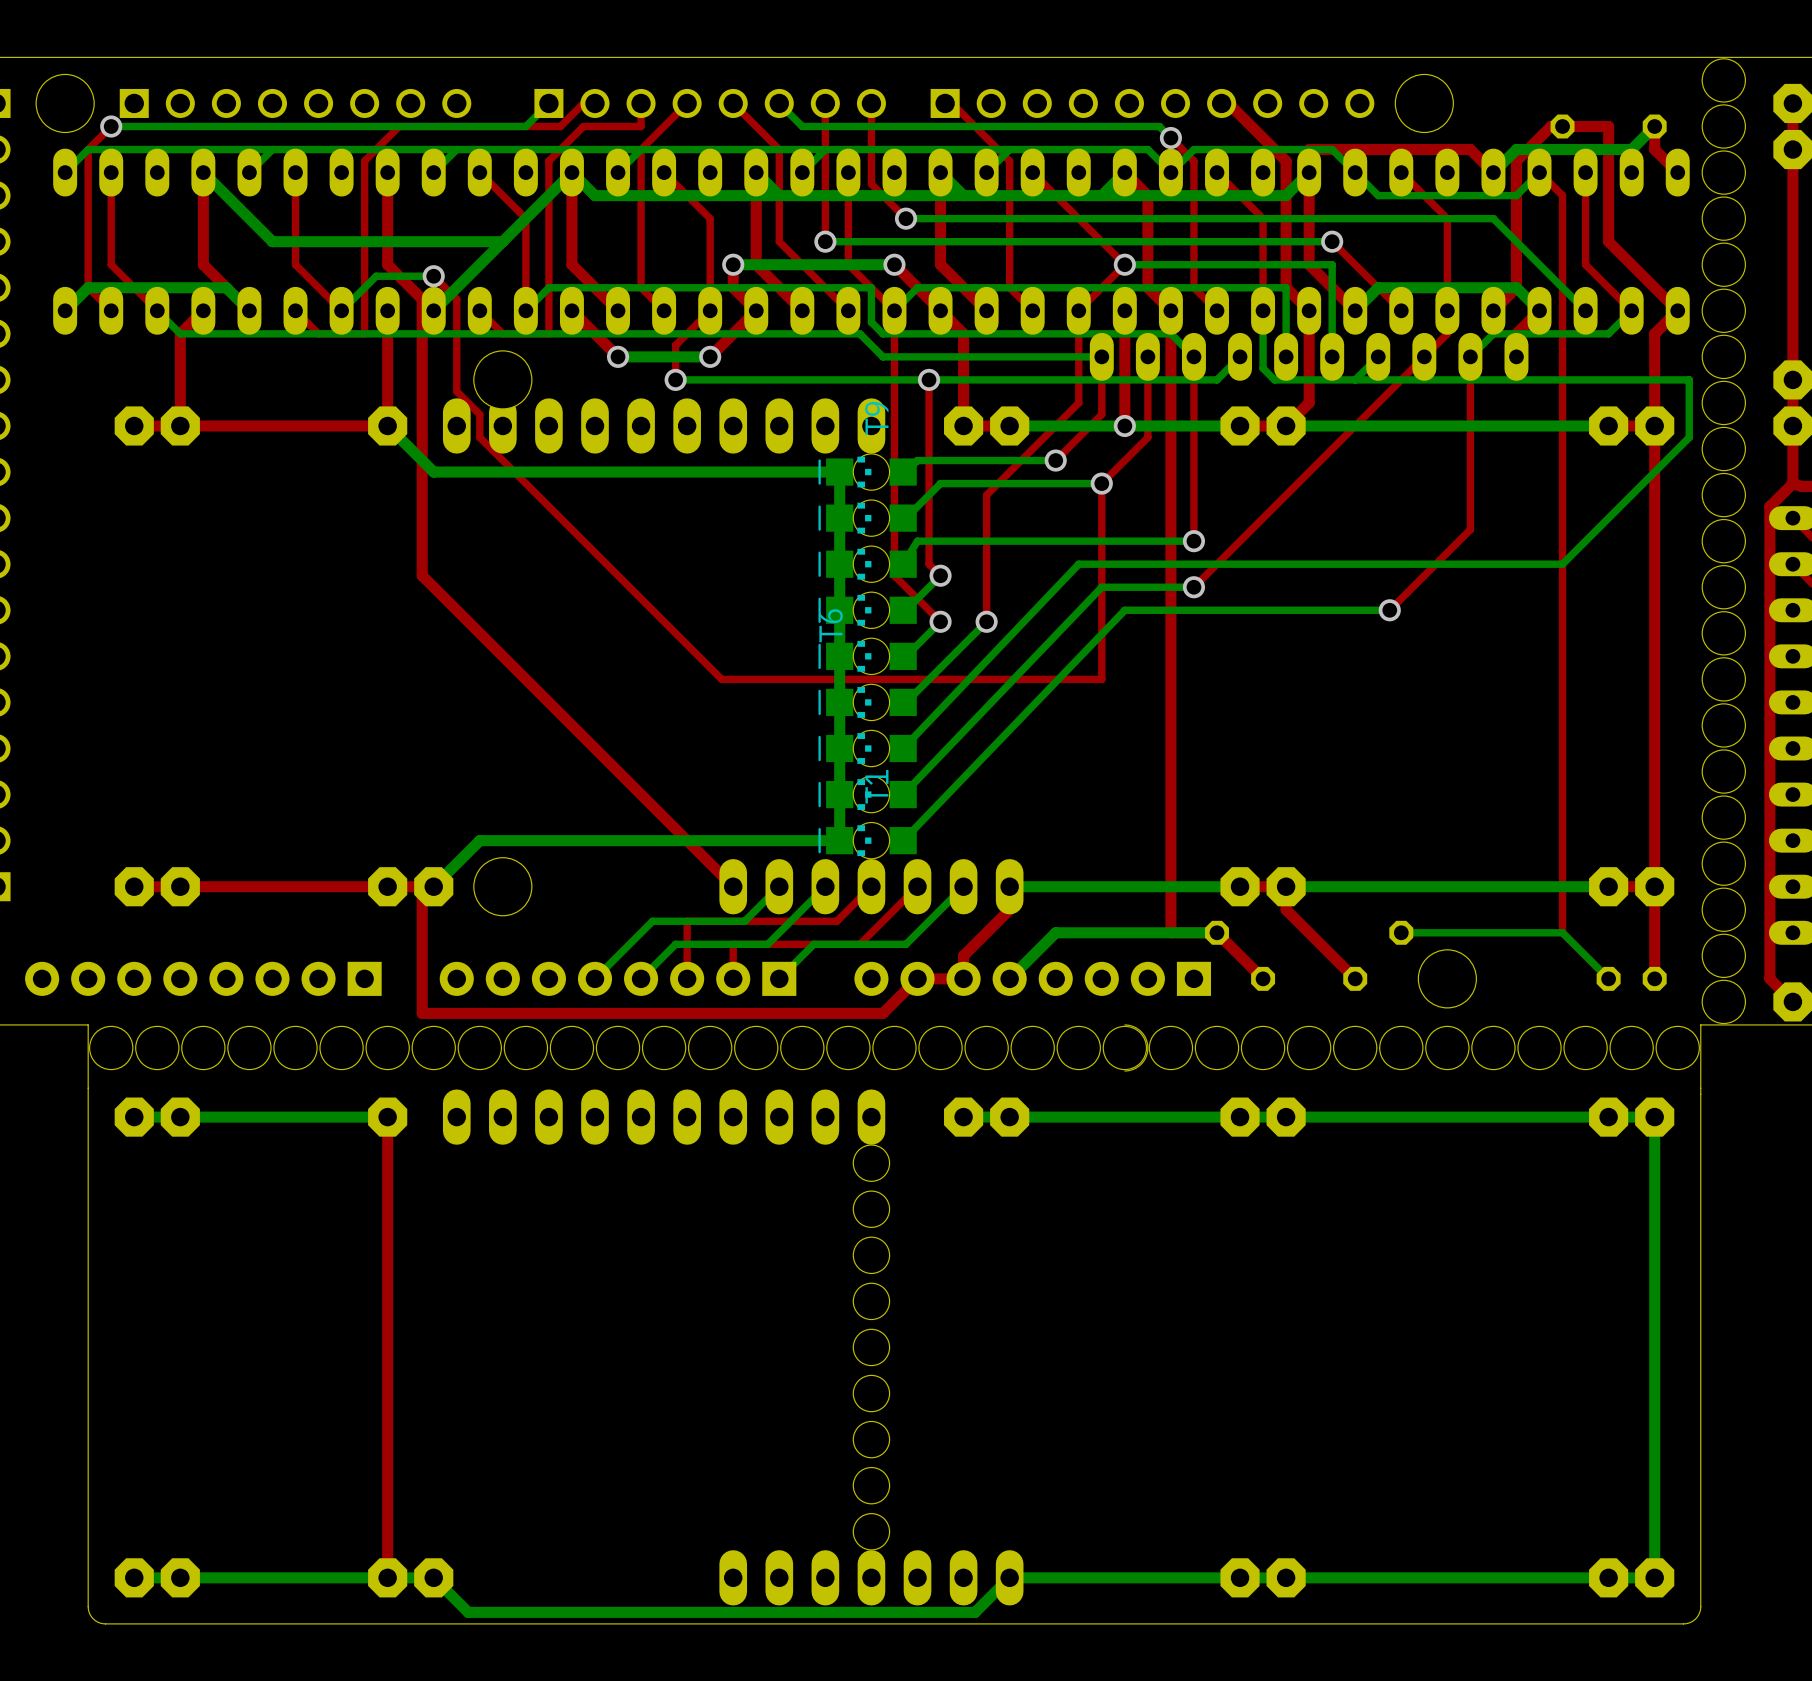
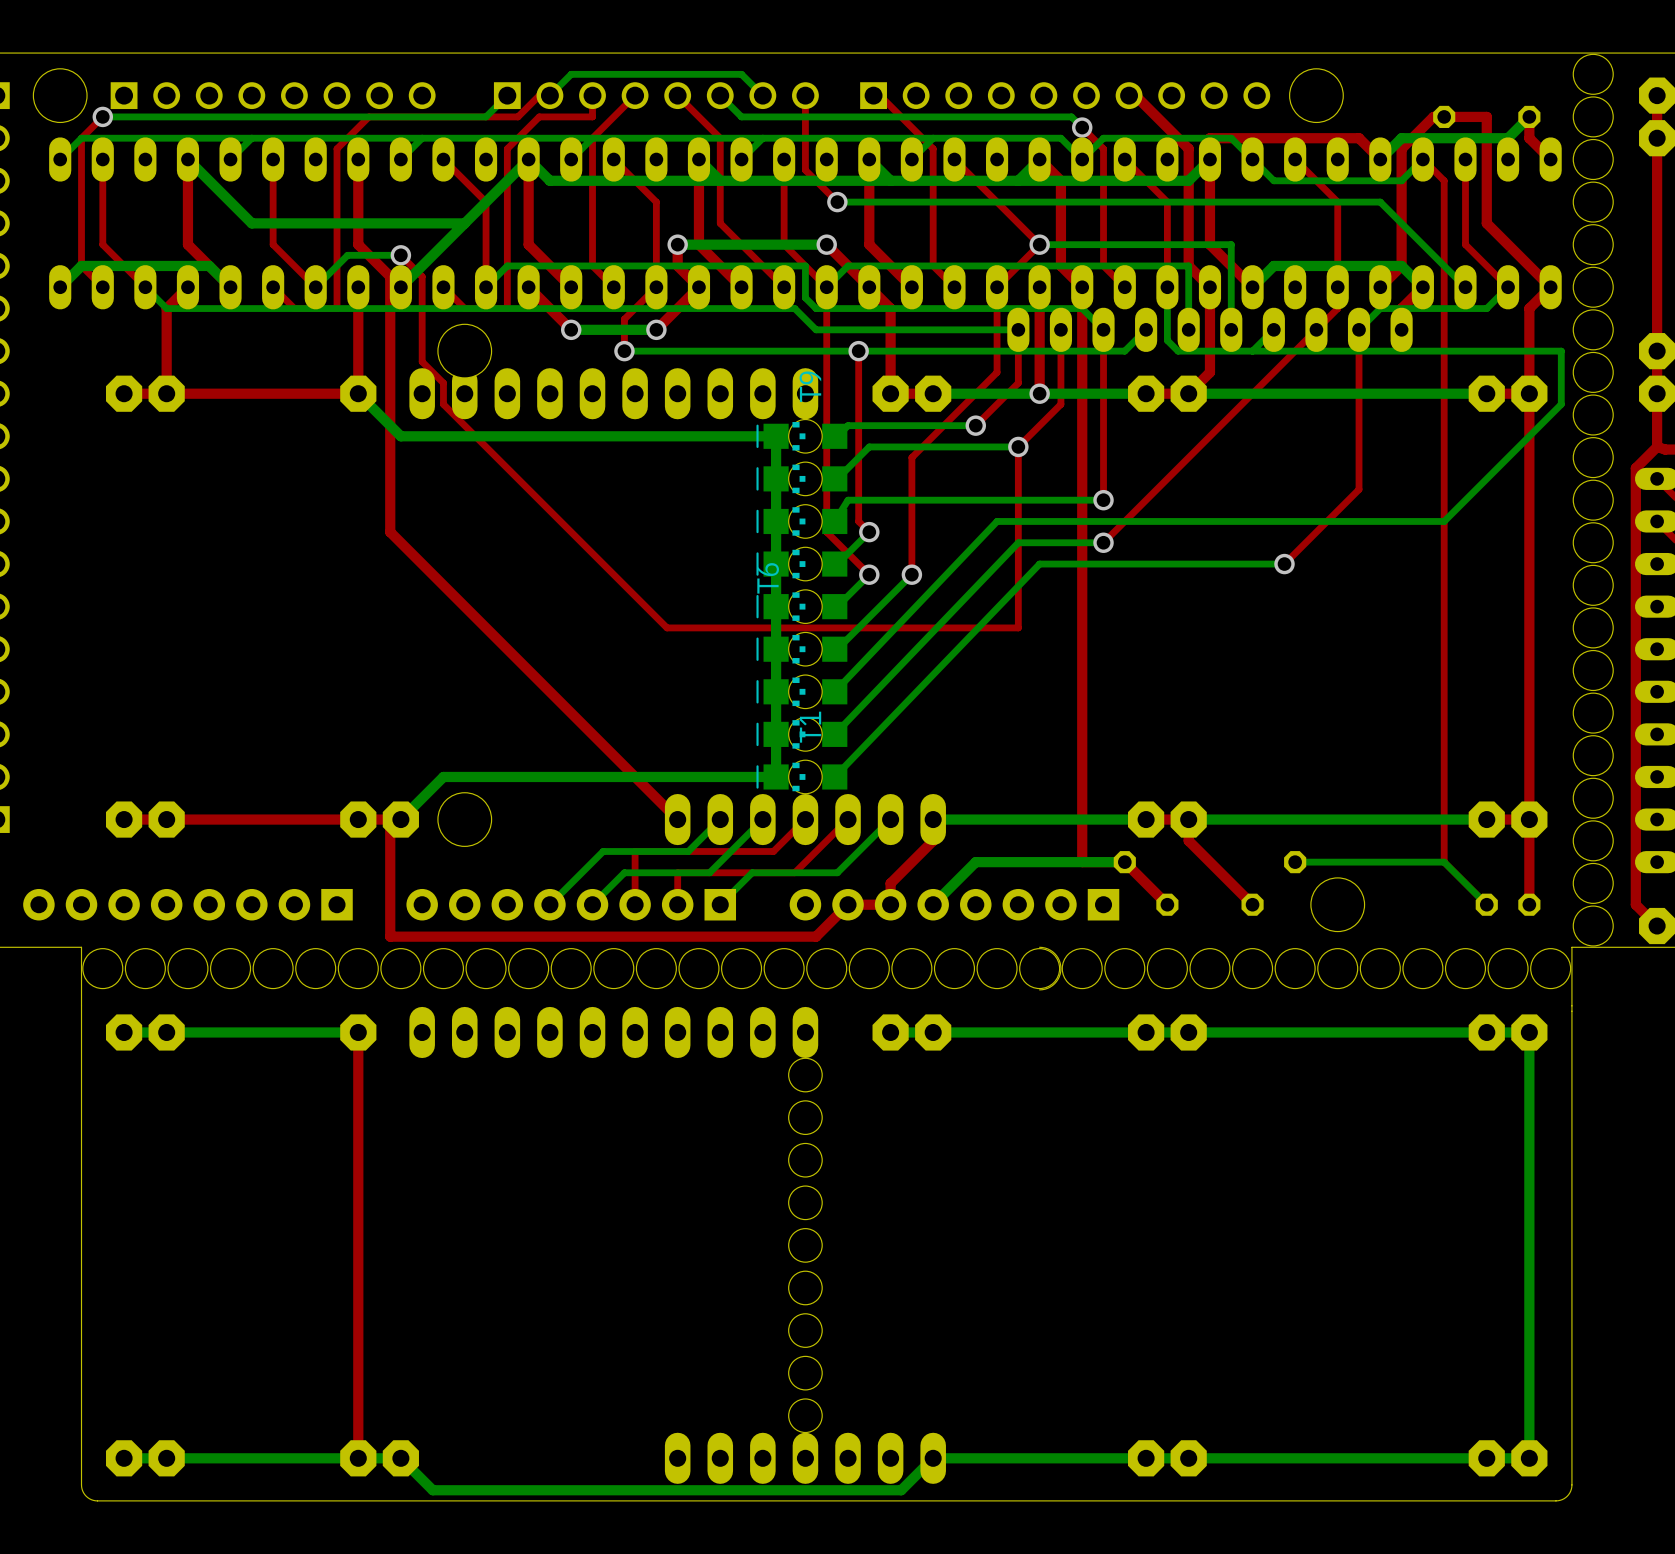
top track: (825, 103) (825, 241) -> none
bottom track: none -> (762, 95) (741, 74) (571, 74) (549, 95)
via: (825, 241) -> none
top track: (1332, 241) (1401, 310) -> none
bottom track: (1332, 241) (825, 241) -> none
via: (1332, 241) -> none

